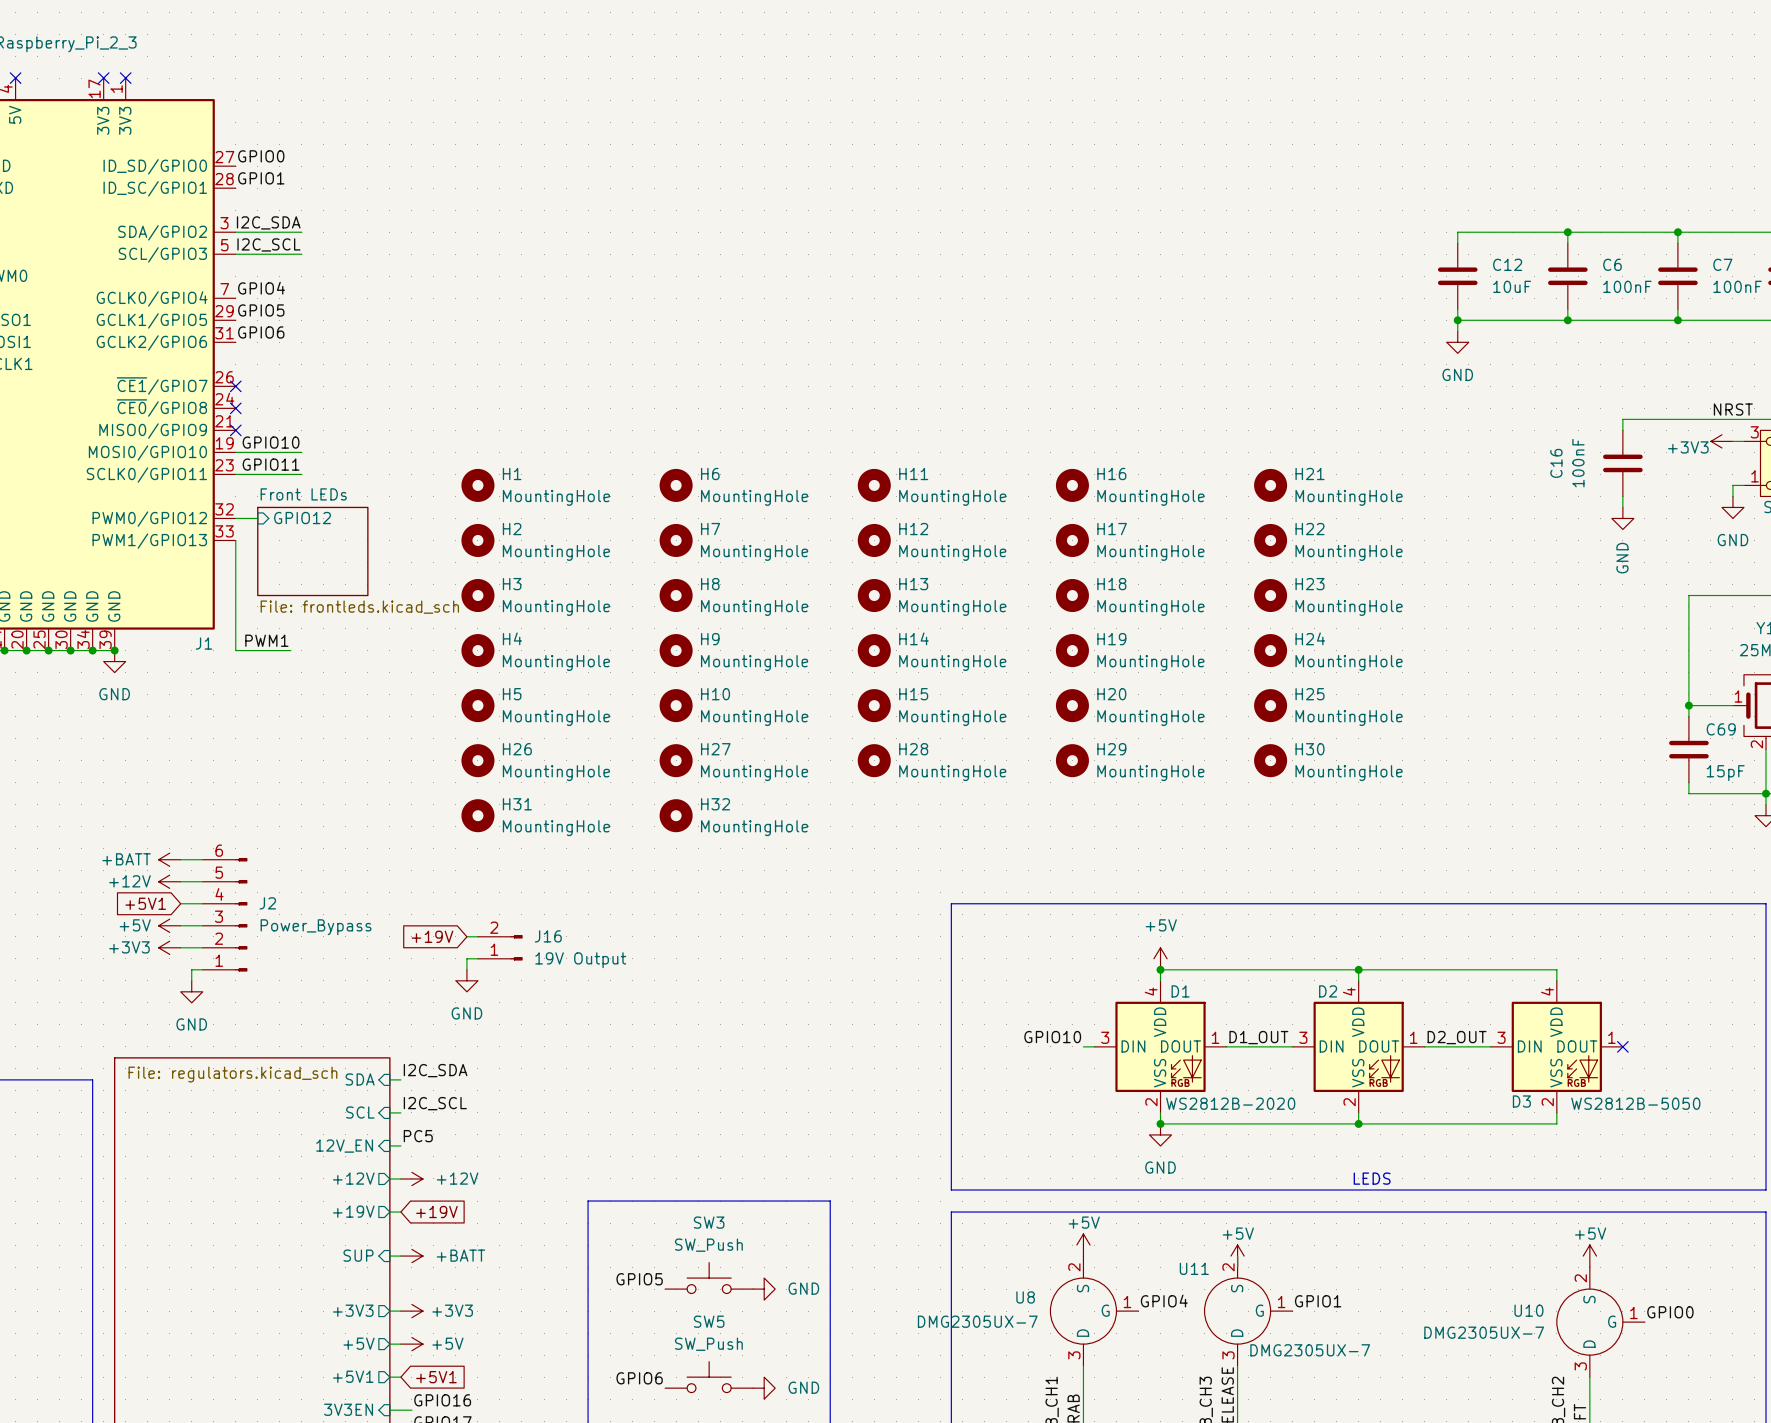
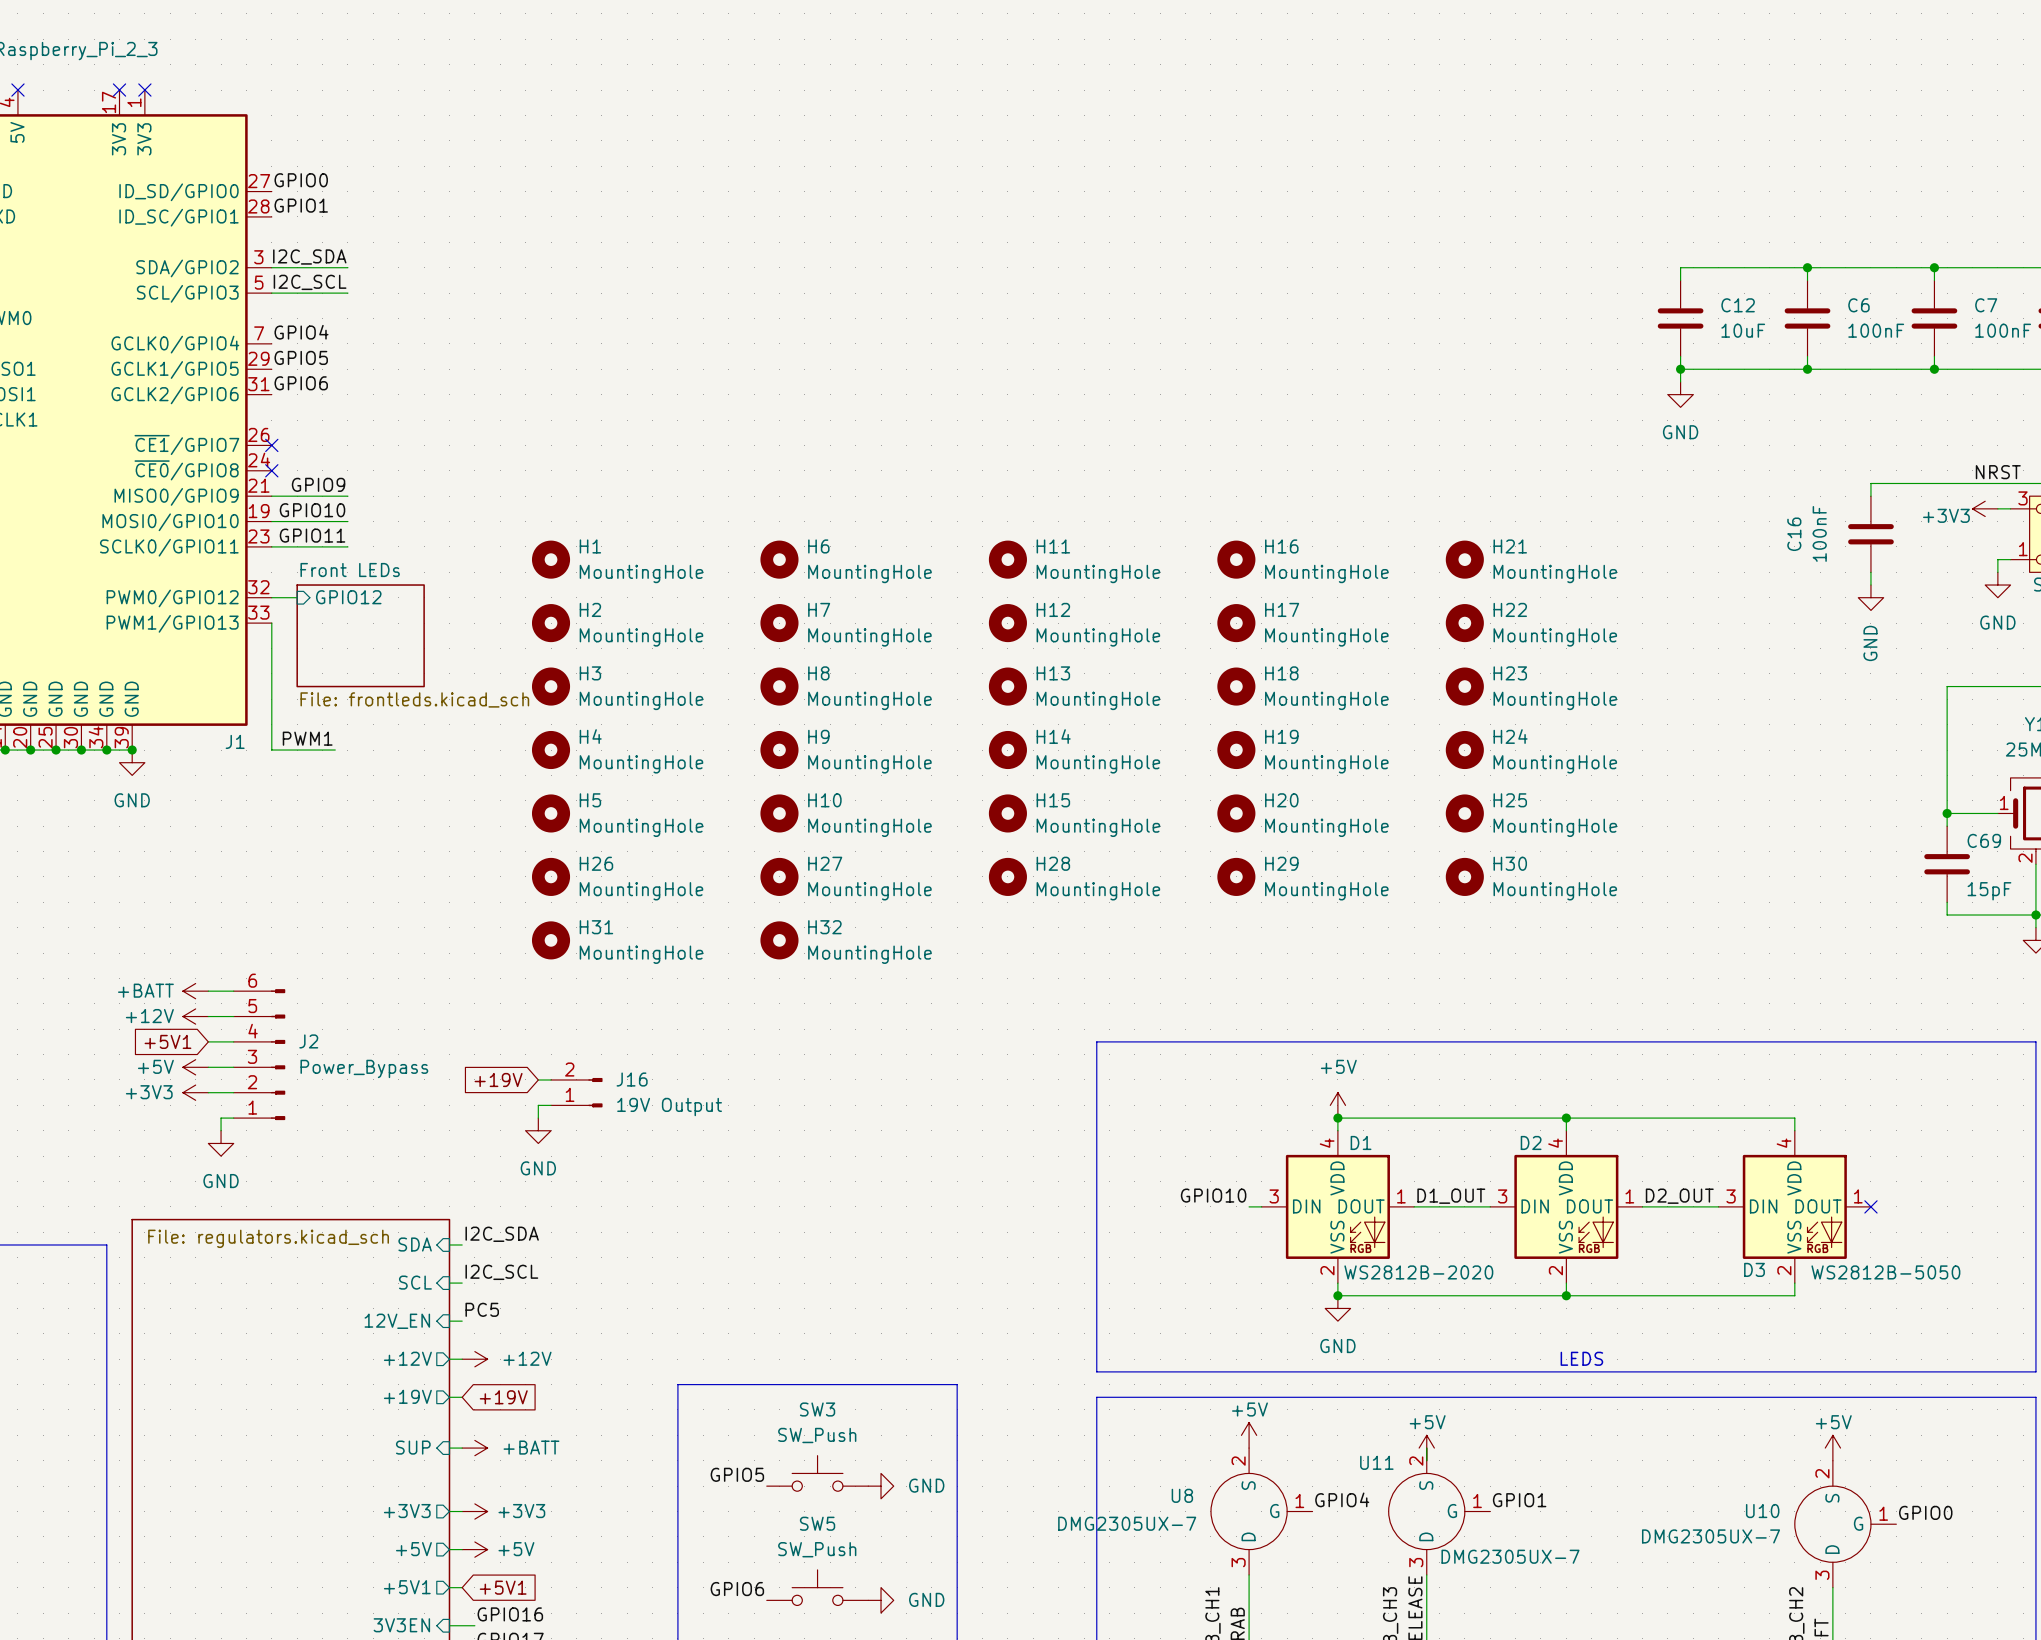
label: none -> GPIO9 (318, 484)
wire: none -> (271, 496) (347, 496)
no-connect mark: (235, 430) -> none

